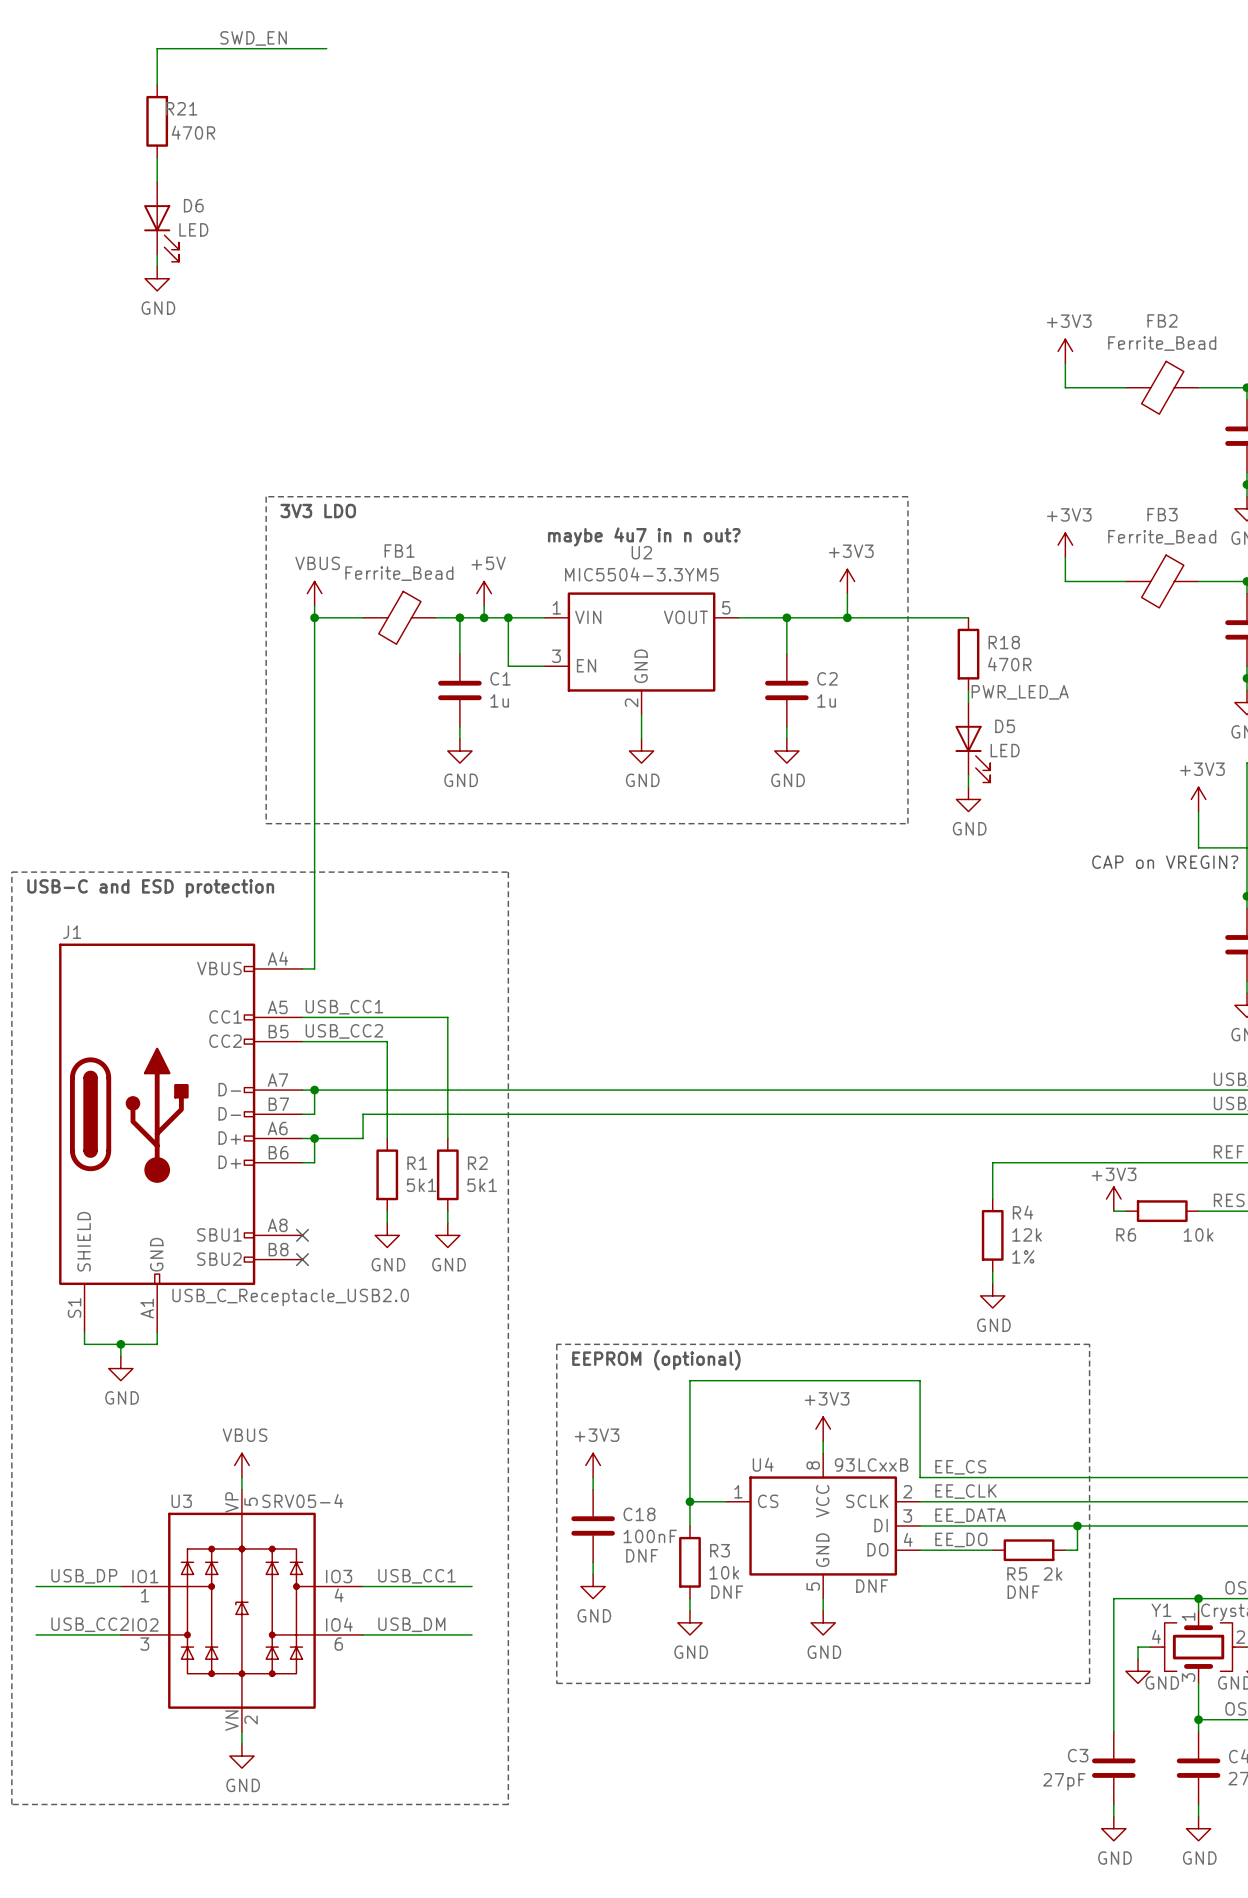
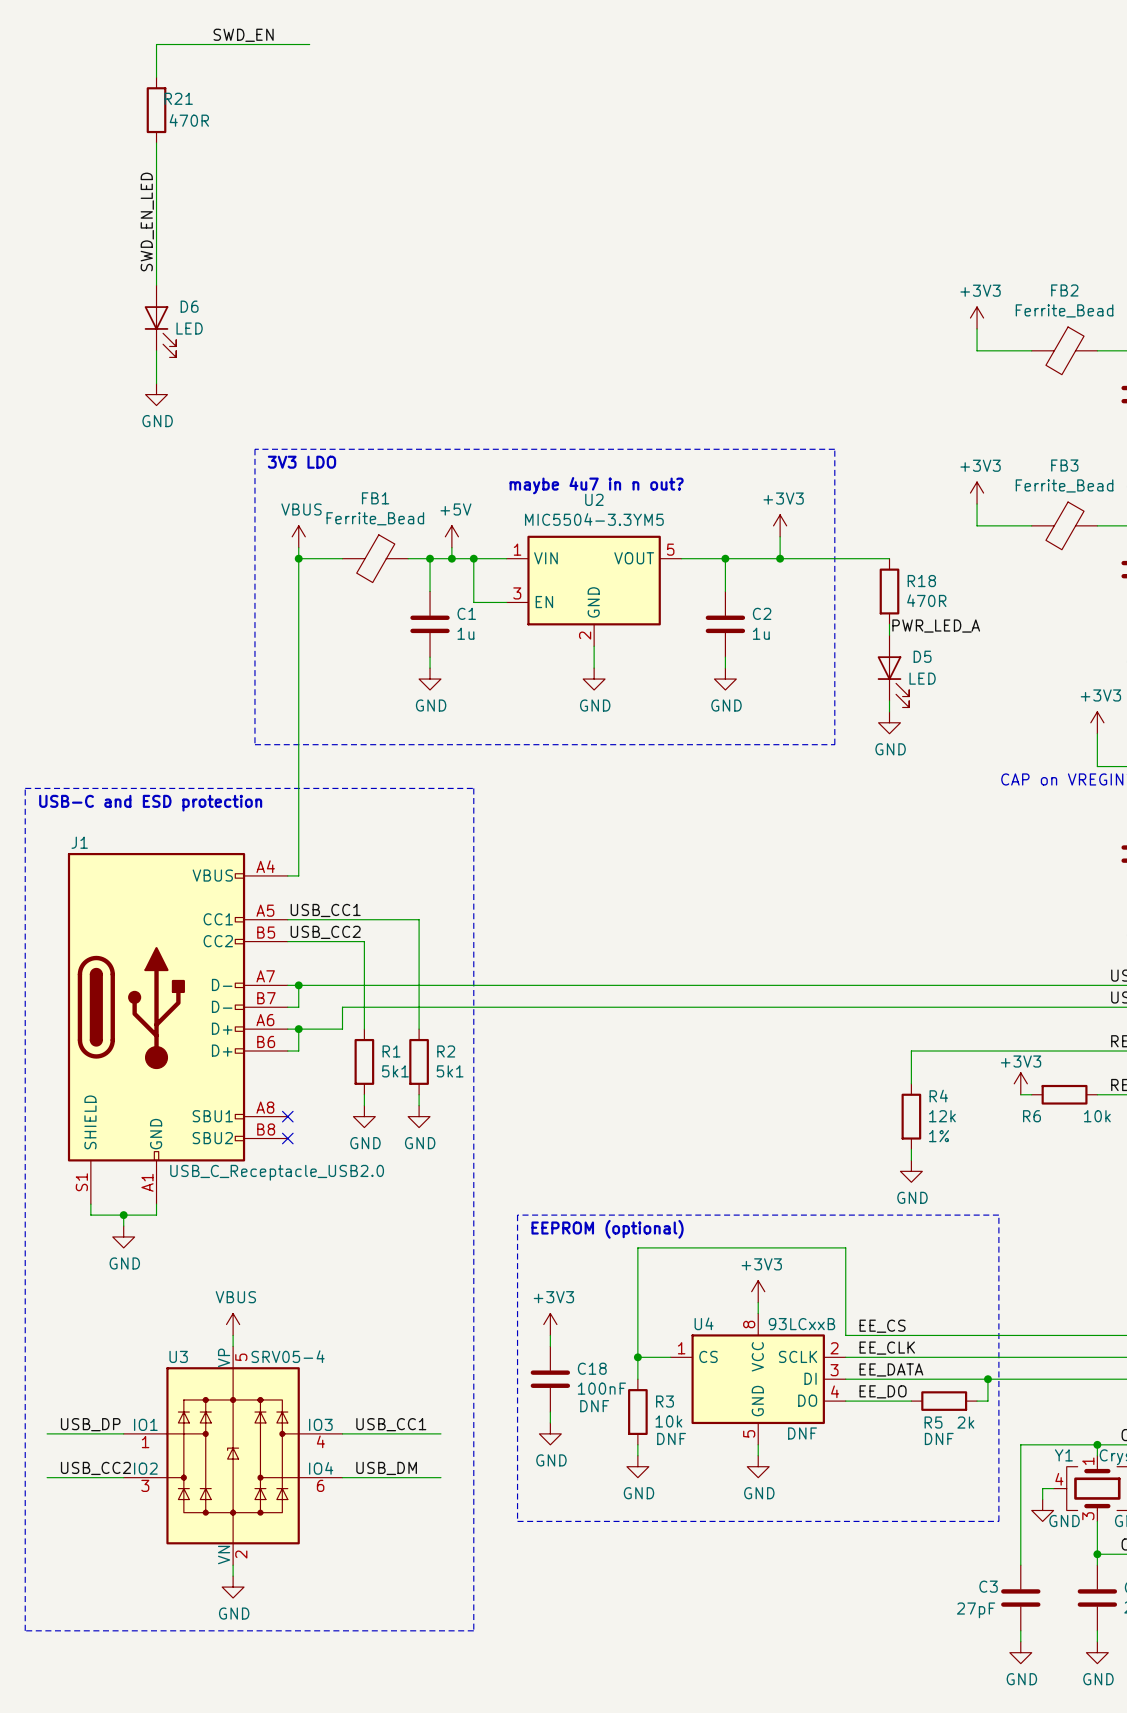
D6 position: (161, 221) -> (160, 321)
label: none -> SWD_EN_LED (147, 221)
wire: none -> (156, 241) (156, 285)
power symbol position: GND (157, 278) -> GND (156, 394)
wire: none -> (156, 350) (156, 383)

